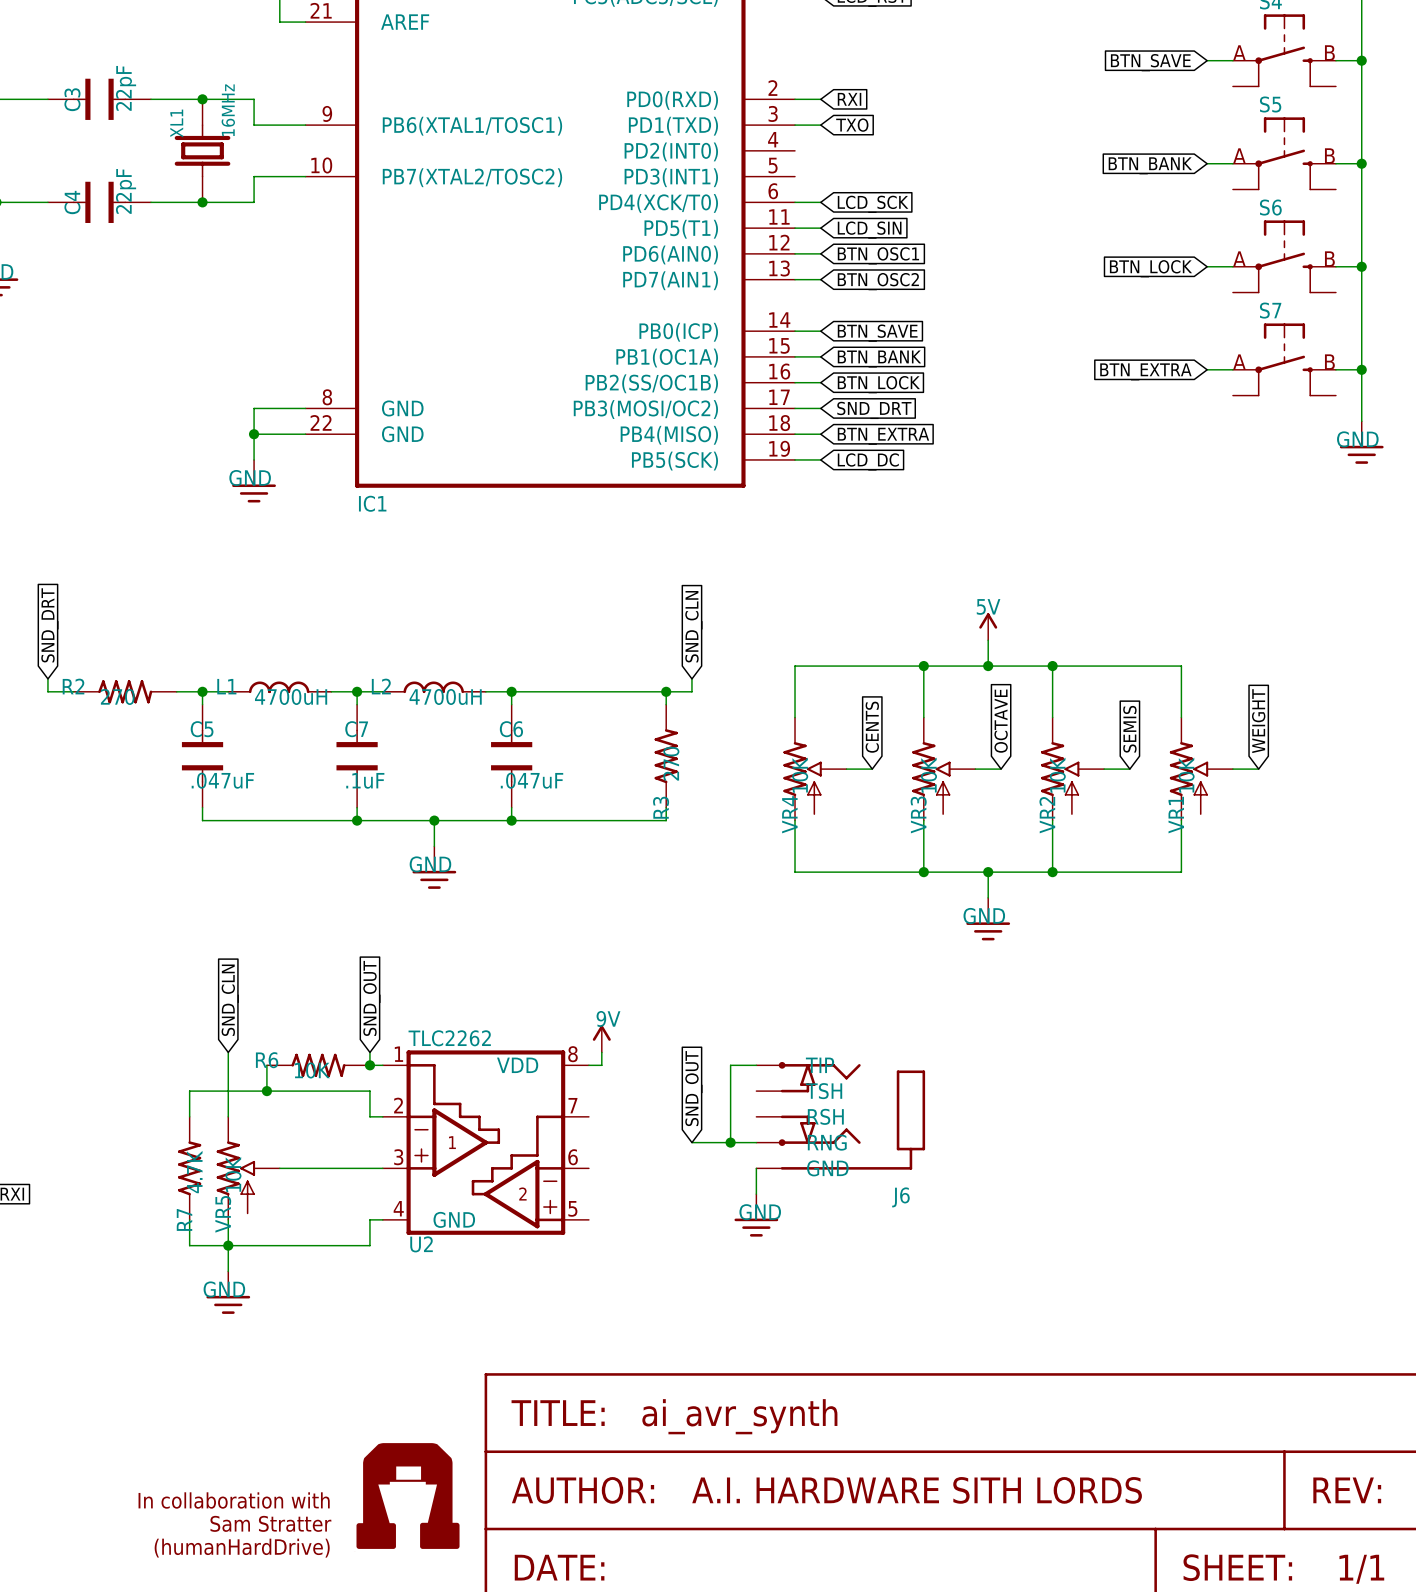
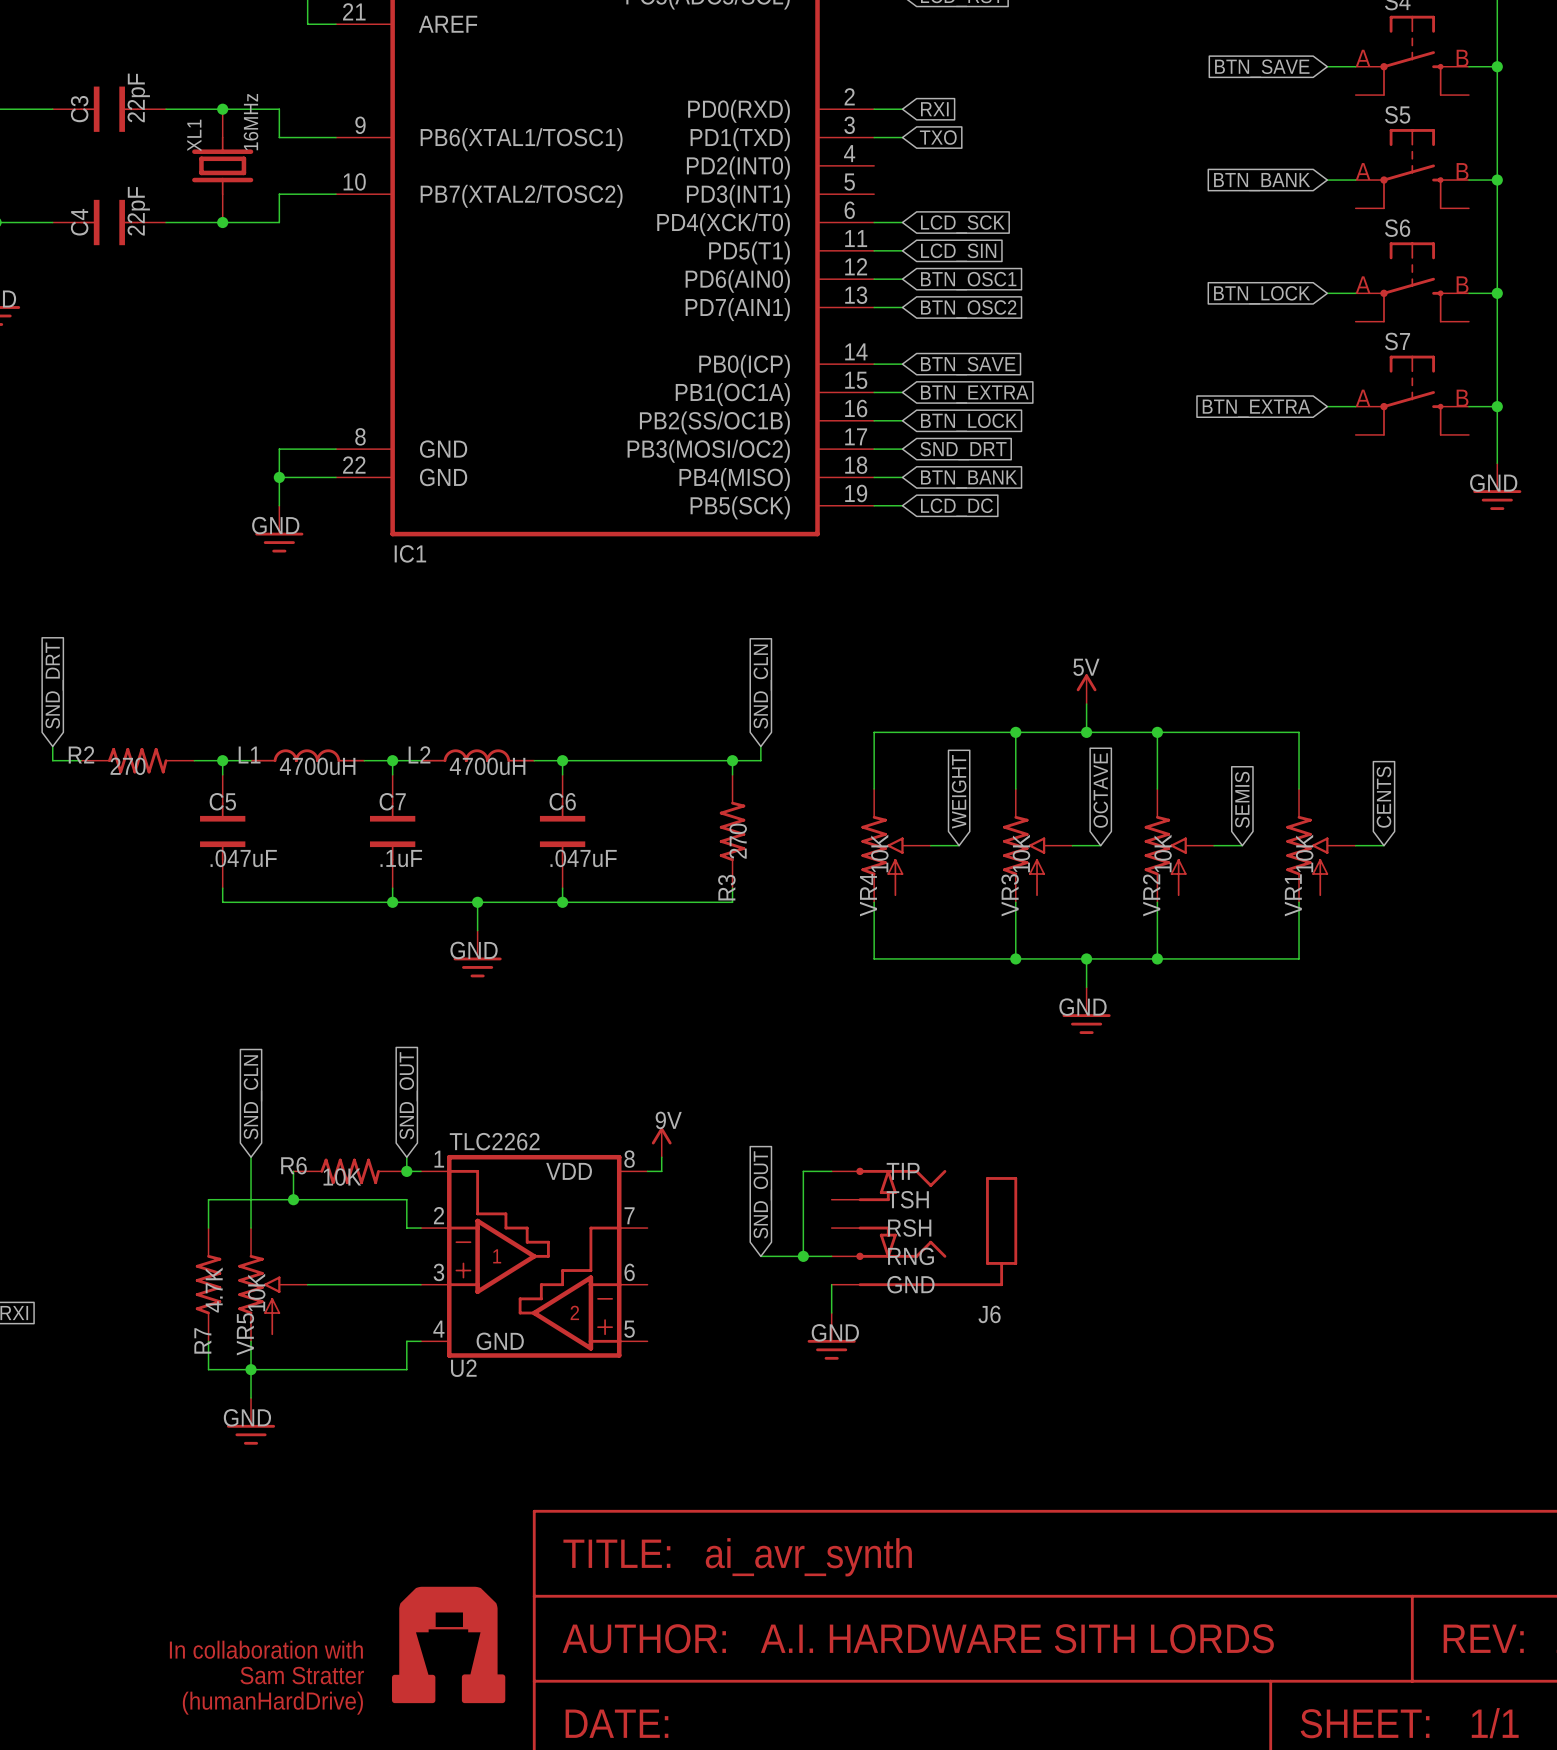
global label: BTN_BANK (879, 359) -> BTN_EXTRA (974, 394)
global label: BTN_EXTRA (883, 436) -> BTN_BANK (969, 479)
global label: WEIGHT (1258, 721) -> CENTS (1383, 797)
global label: CENTS (872, 727) -> WEIGHT (959, 791)

